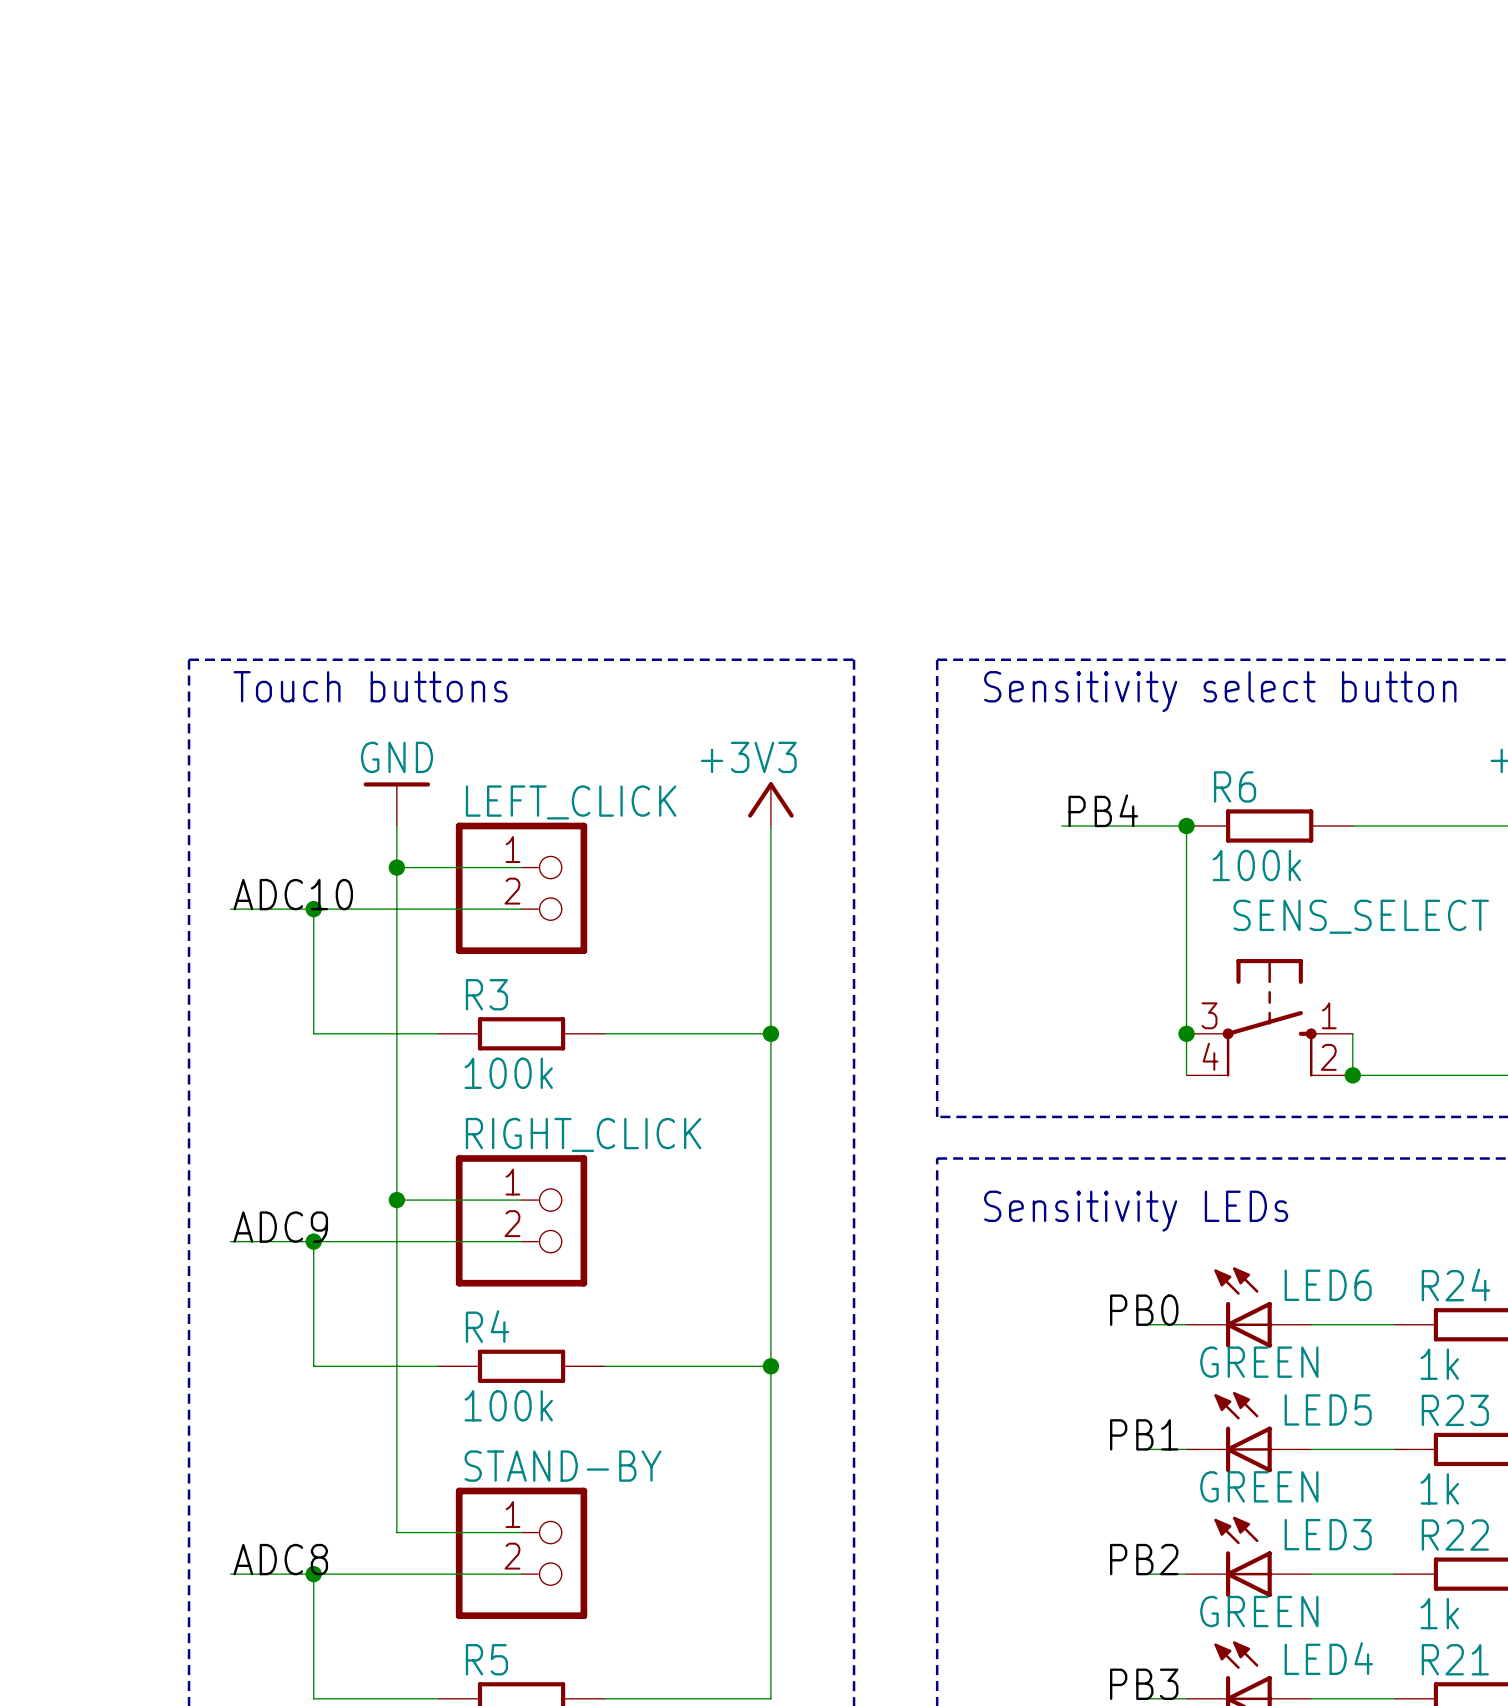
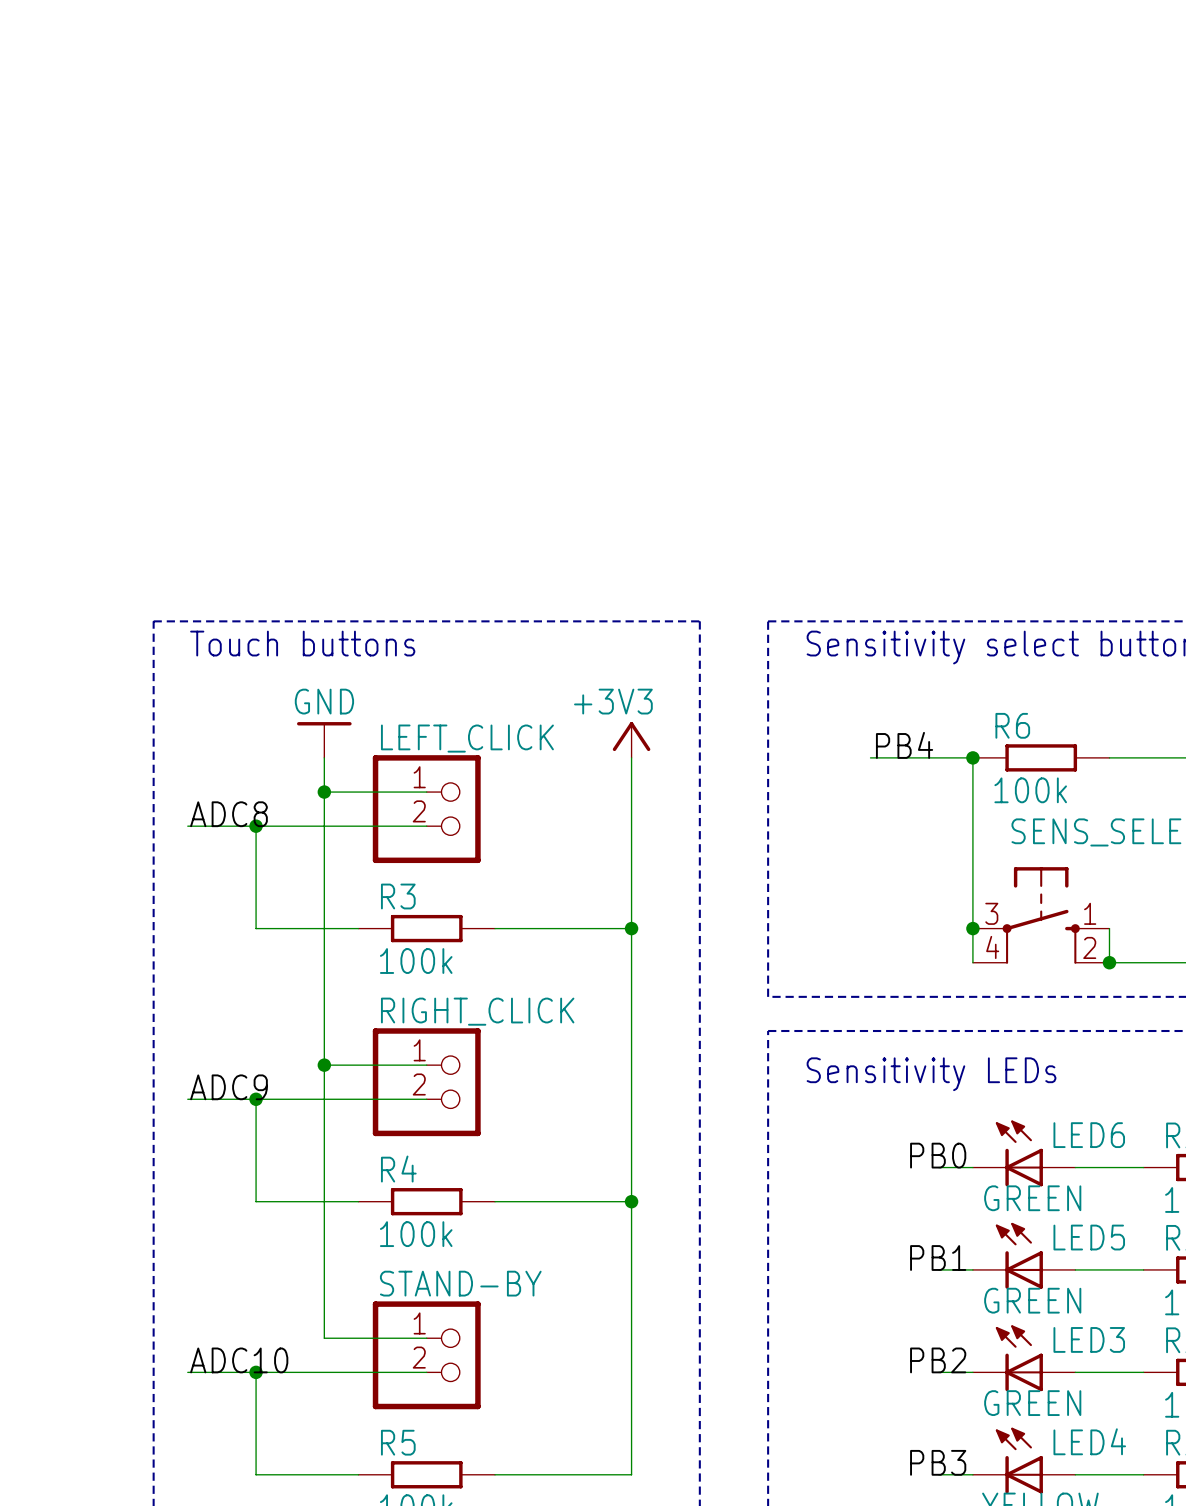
label: ADC10 (293, 894) -> ADC8 (228, 814)
label: ADC8 (280, 1559) -> ADC10 (239, 1360)

